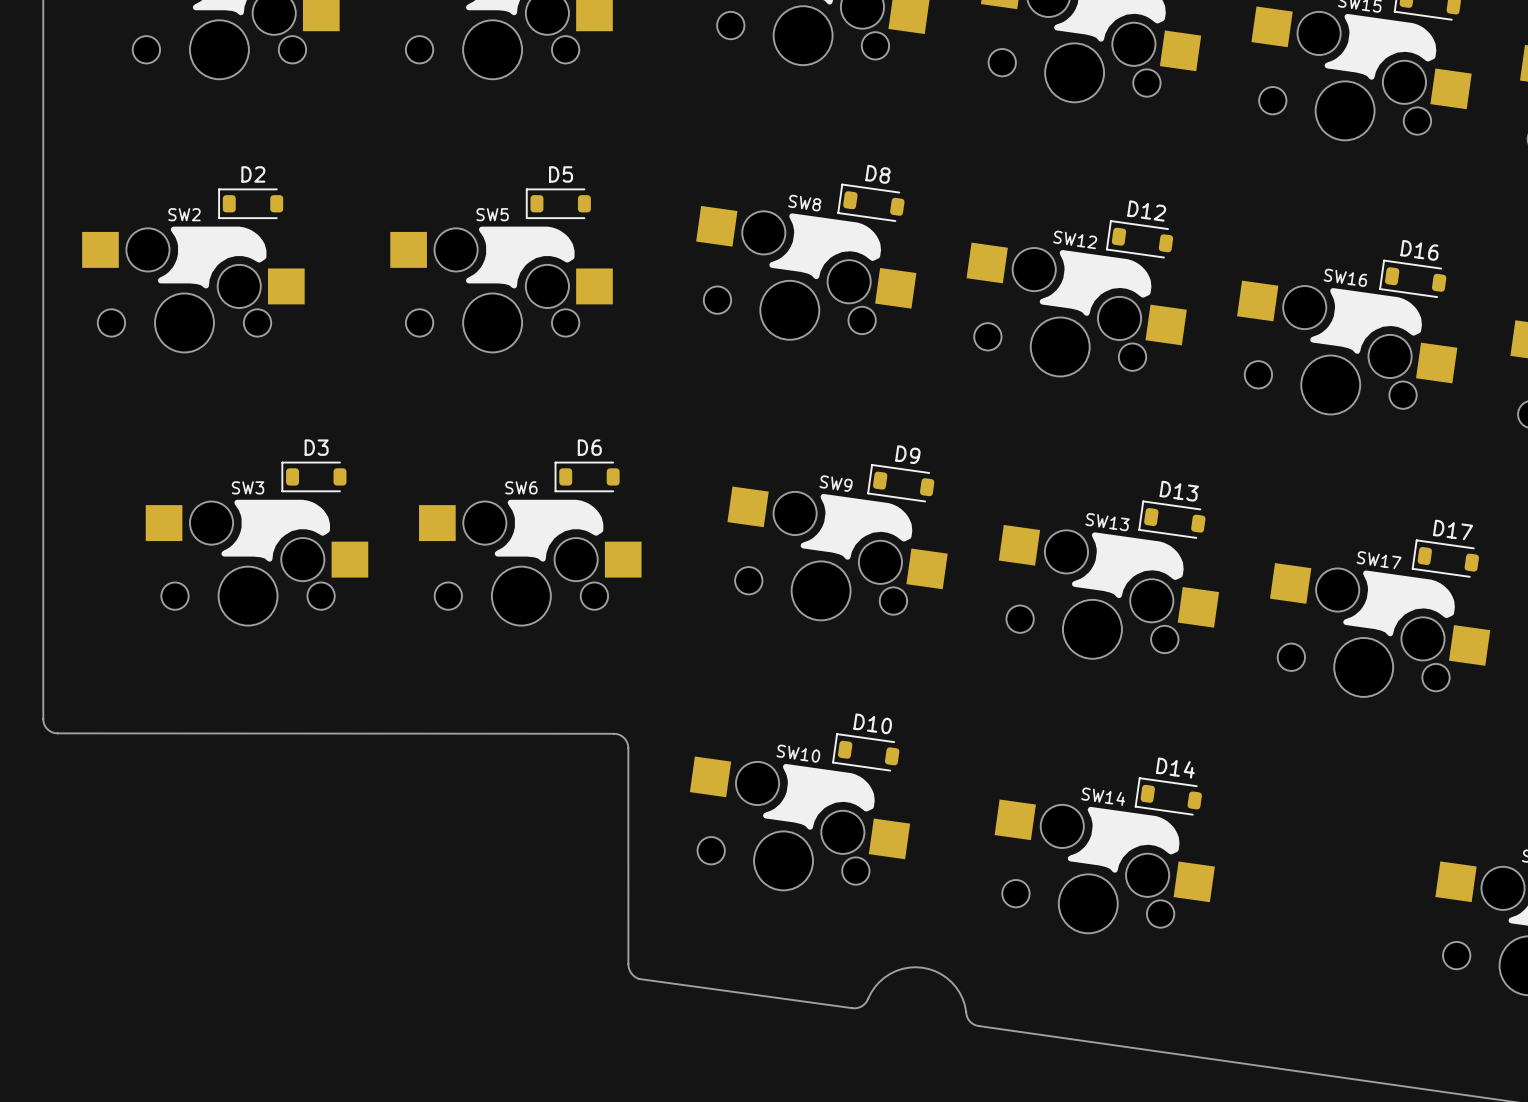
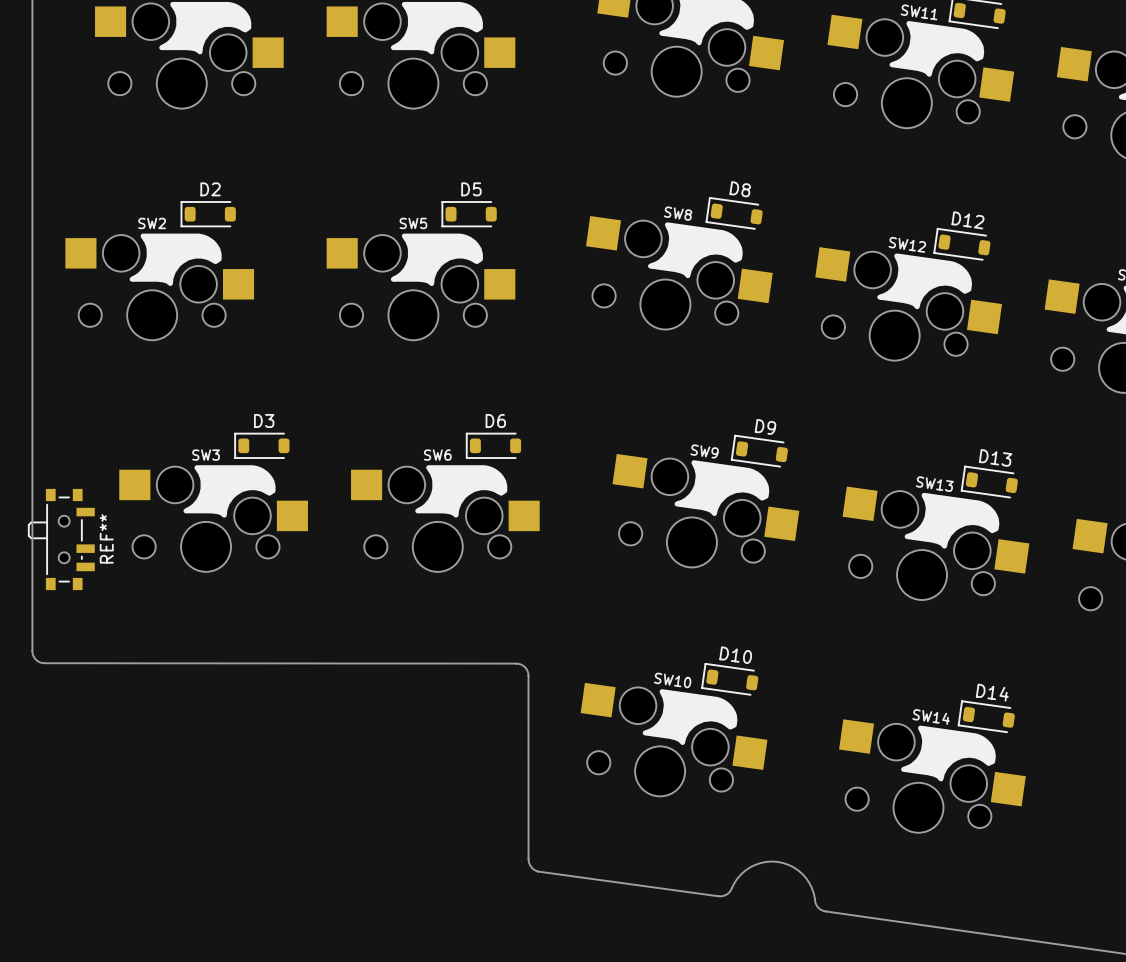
REF**: none -> (61, 539)

